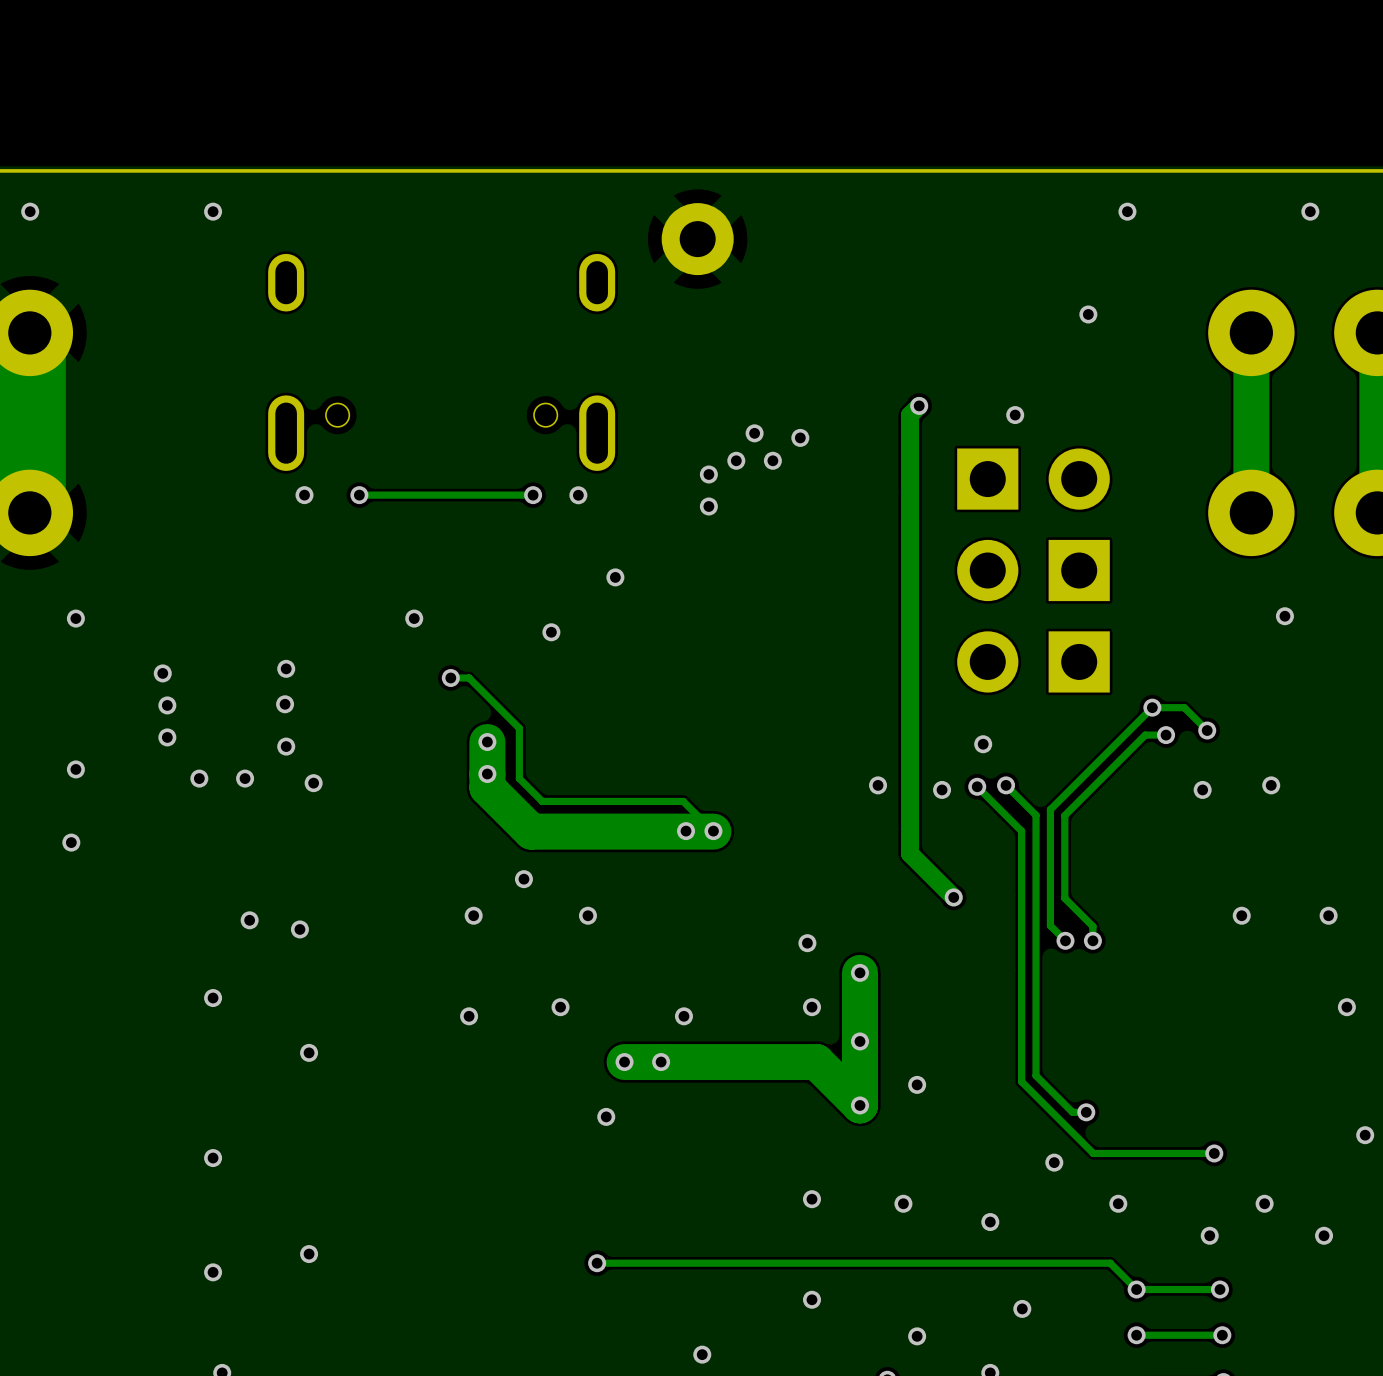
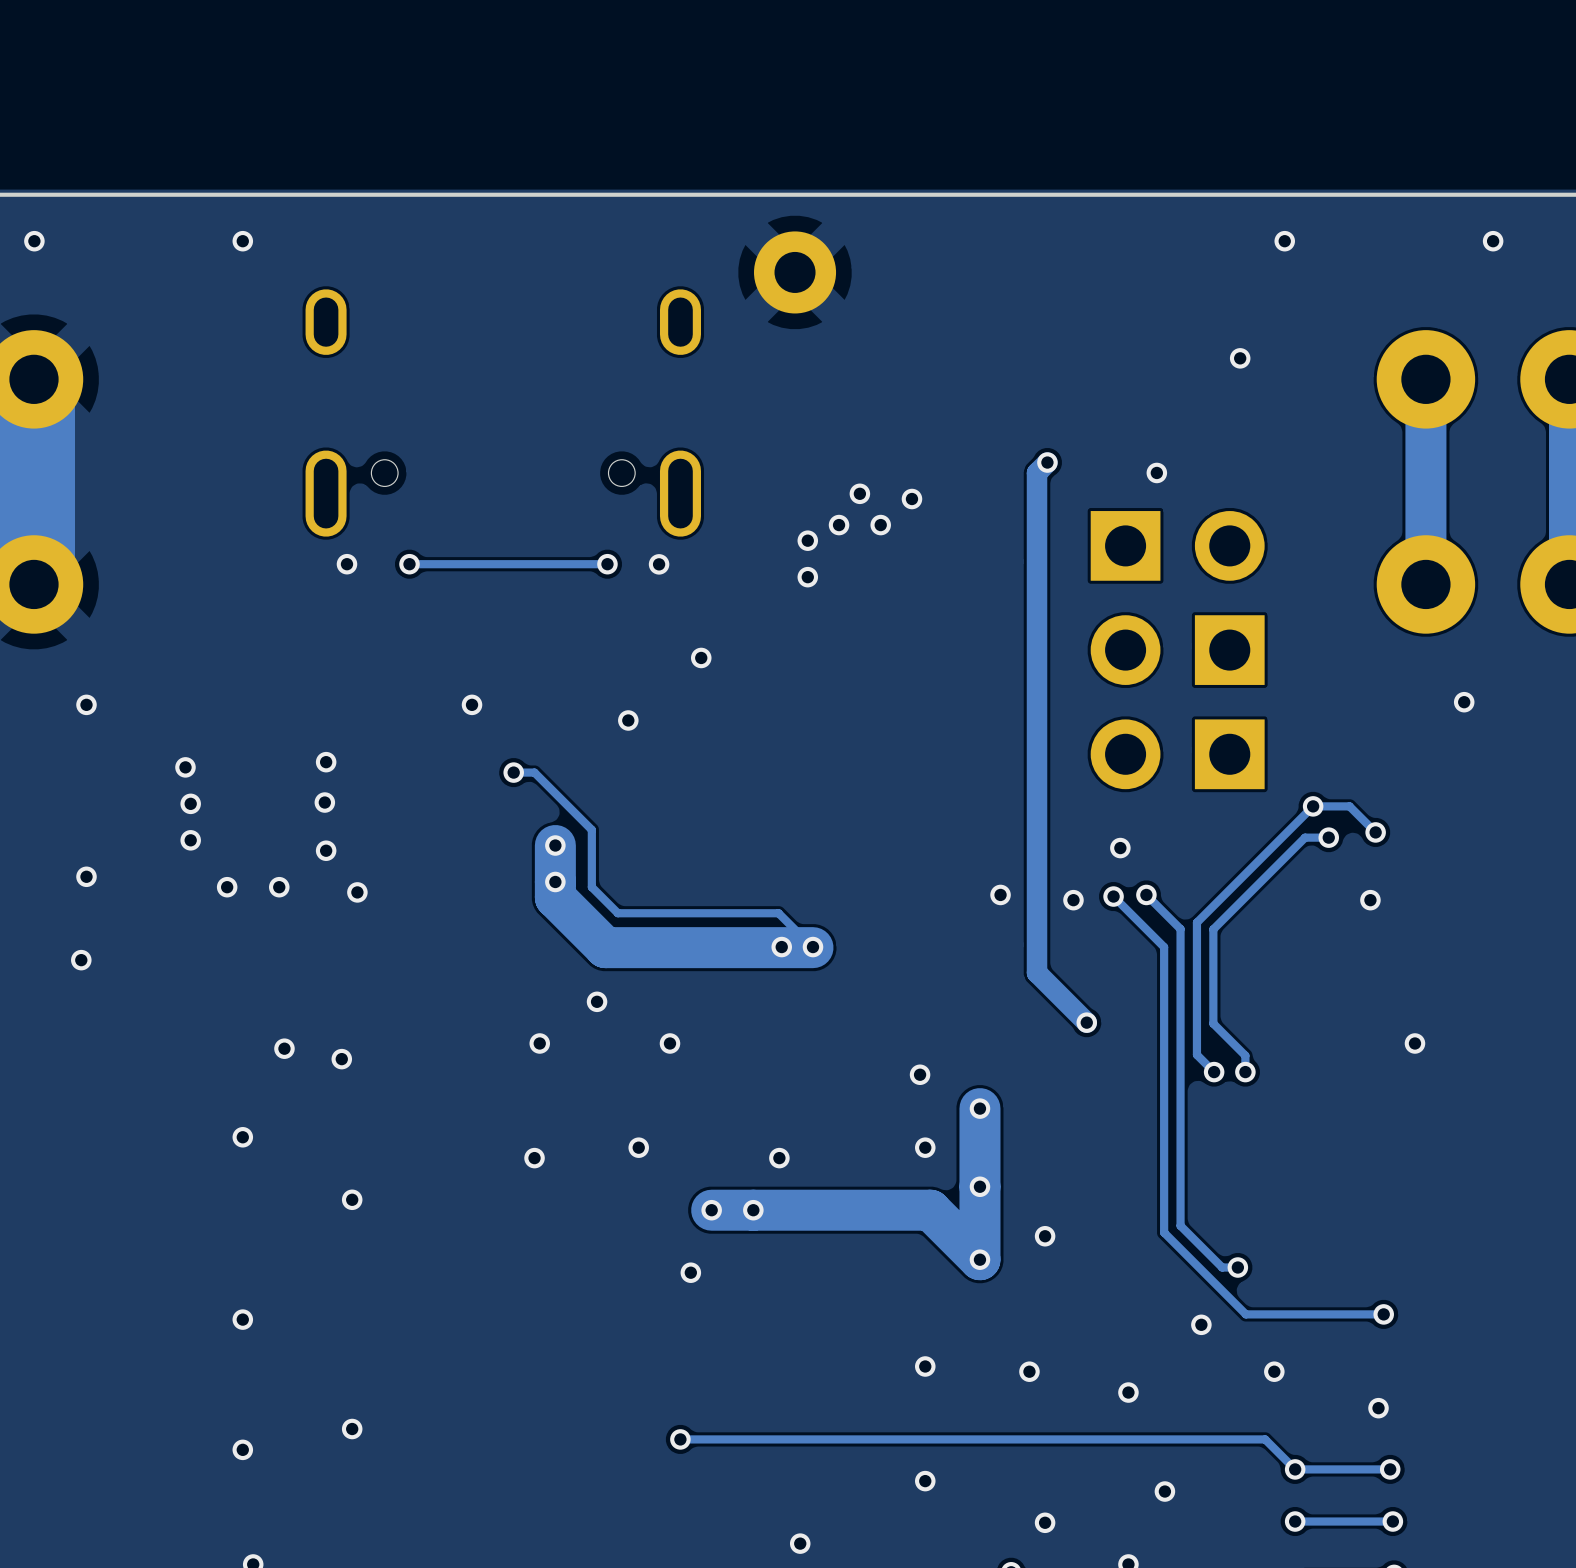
via: (1271, 785) -> none
via: (1328, 915) -> none
via: (1346, 1007) -> none
via: (1365, 1135) -> none
via: (1264, 1203) -> none
via: (1324, 1235) -> none

